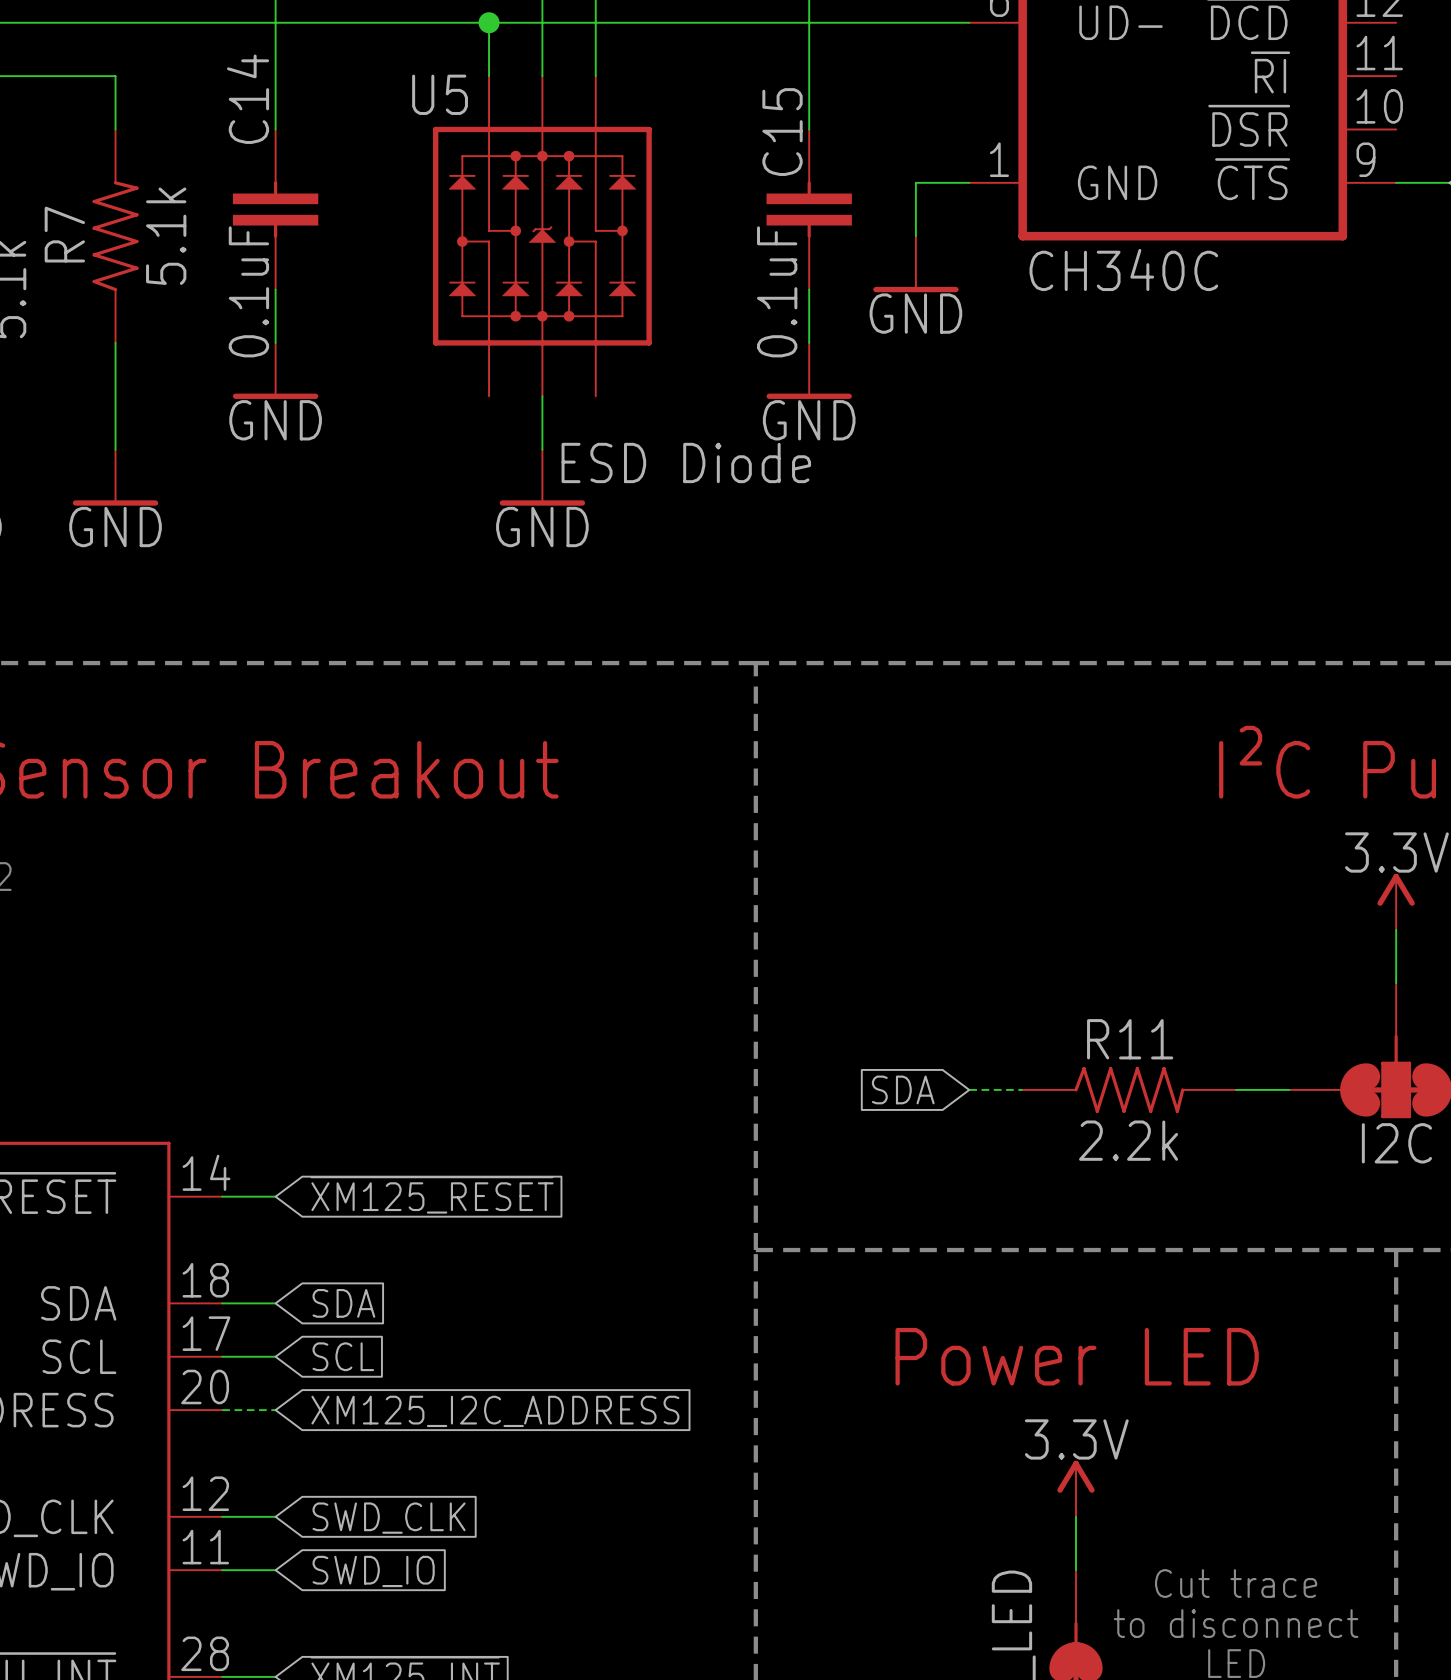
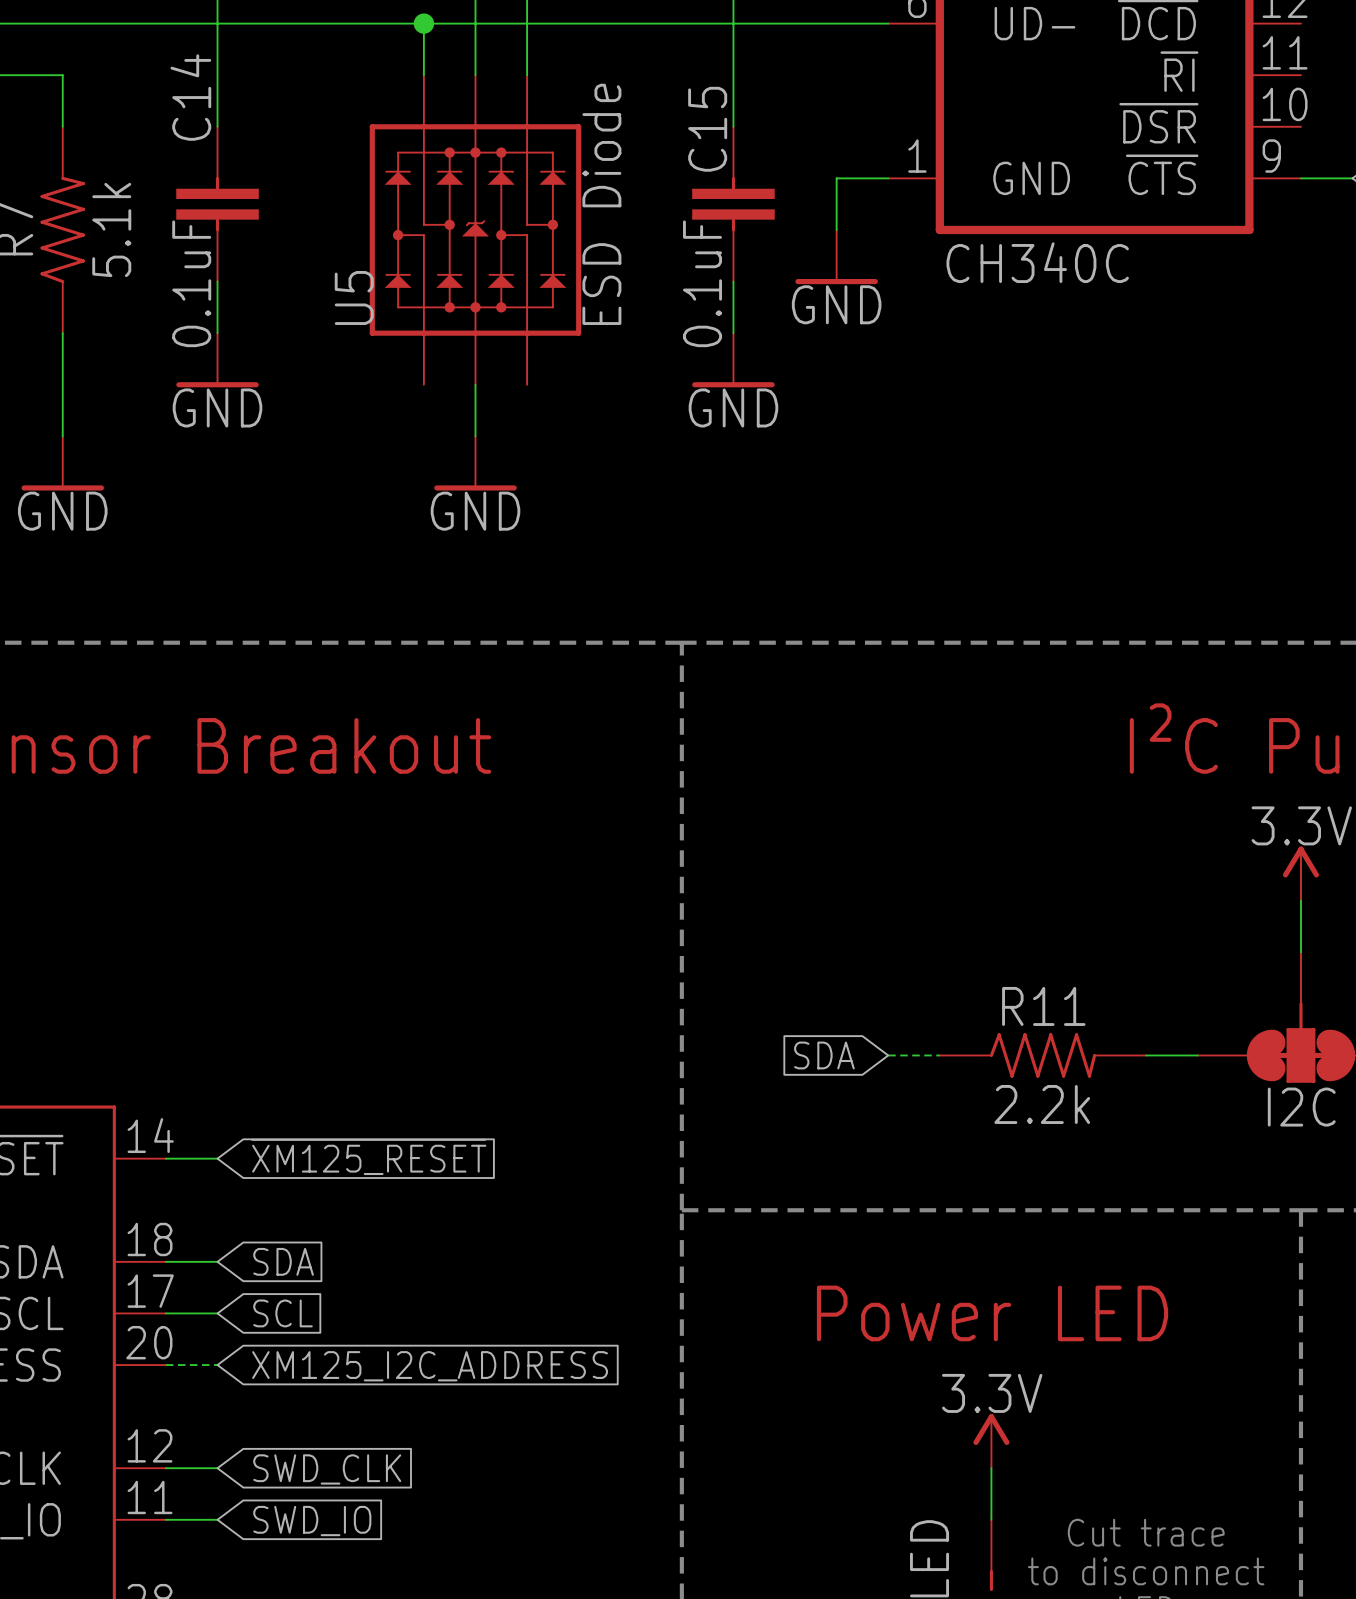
U5 name rotation: 0° (440, 94) -> 90° counterclockwise (354, 297)
U5 name position: U5 (440, 94) -> U5 (354, 297)
U5 value rotation: 0° (686, 462) -> 90° counterclockwise (601, 204)

